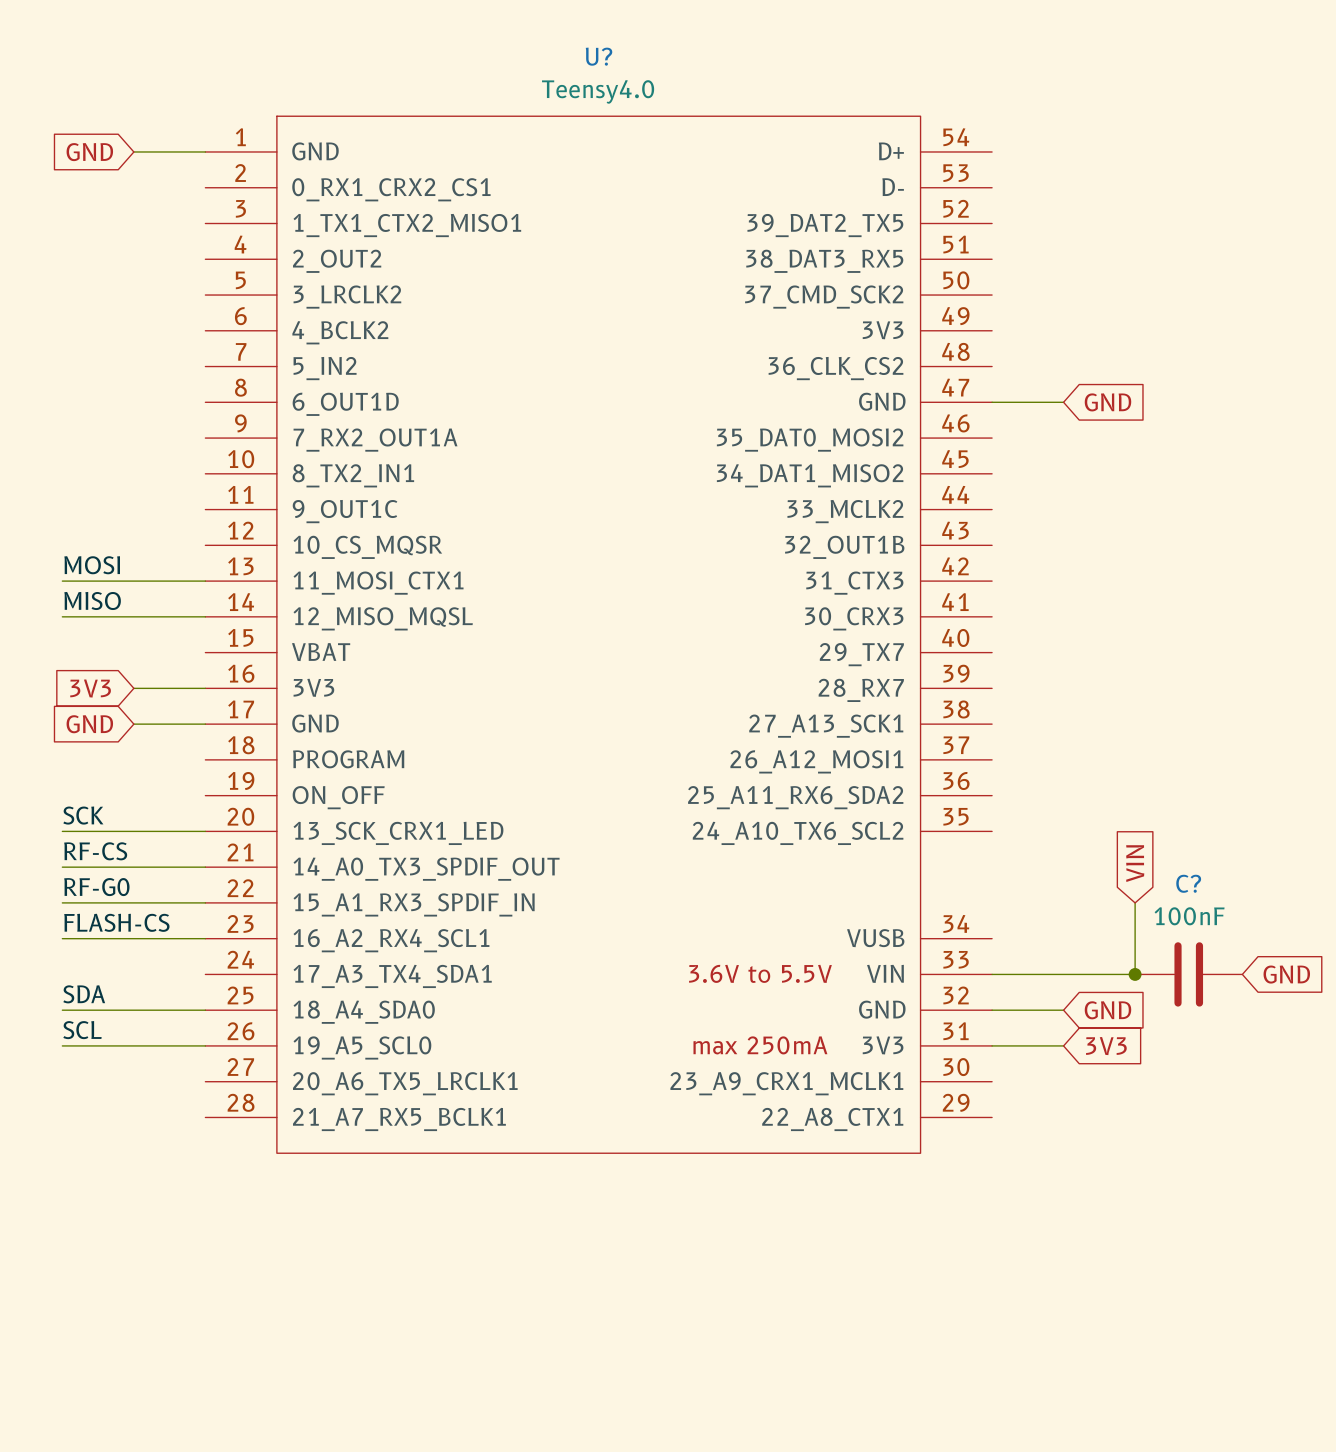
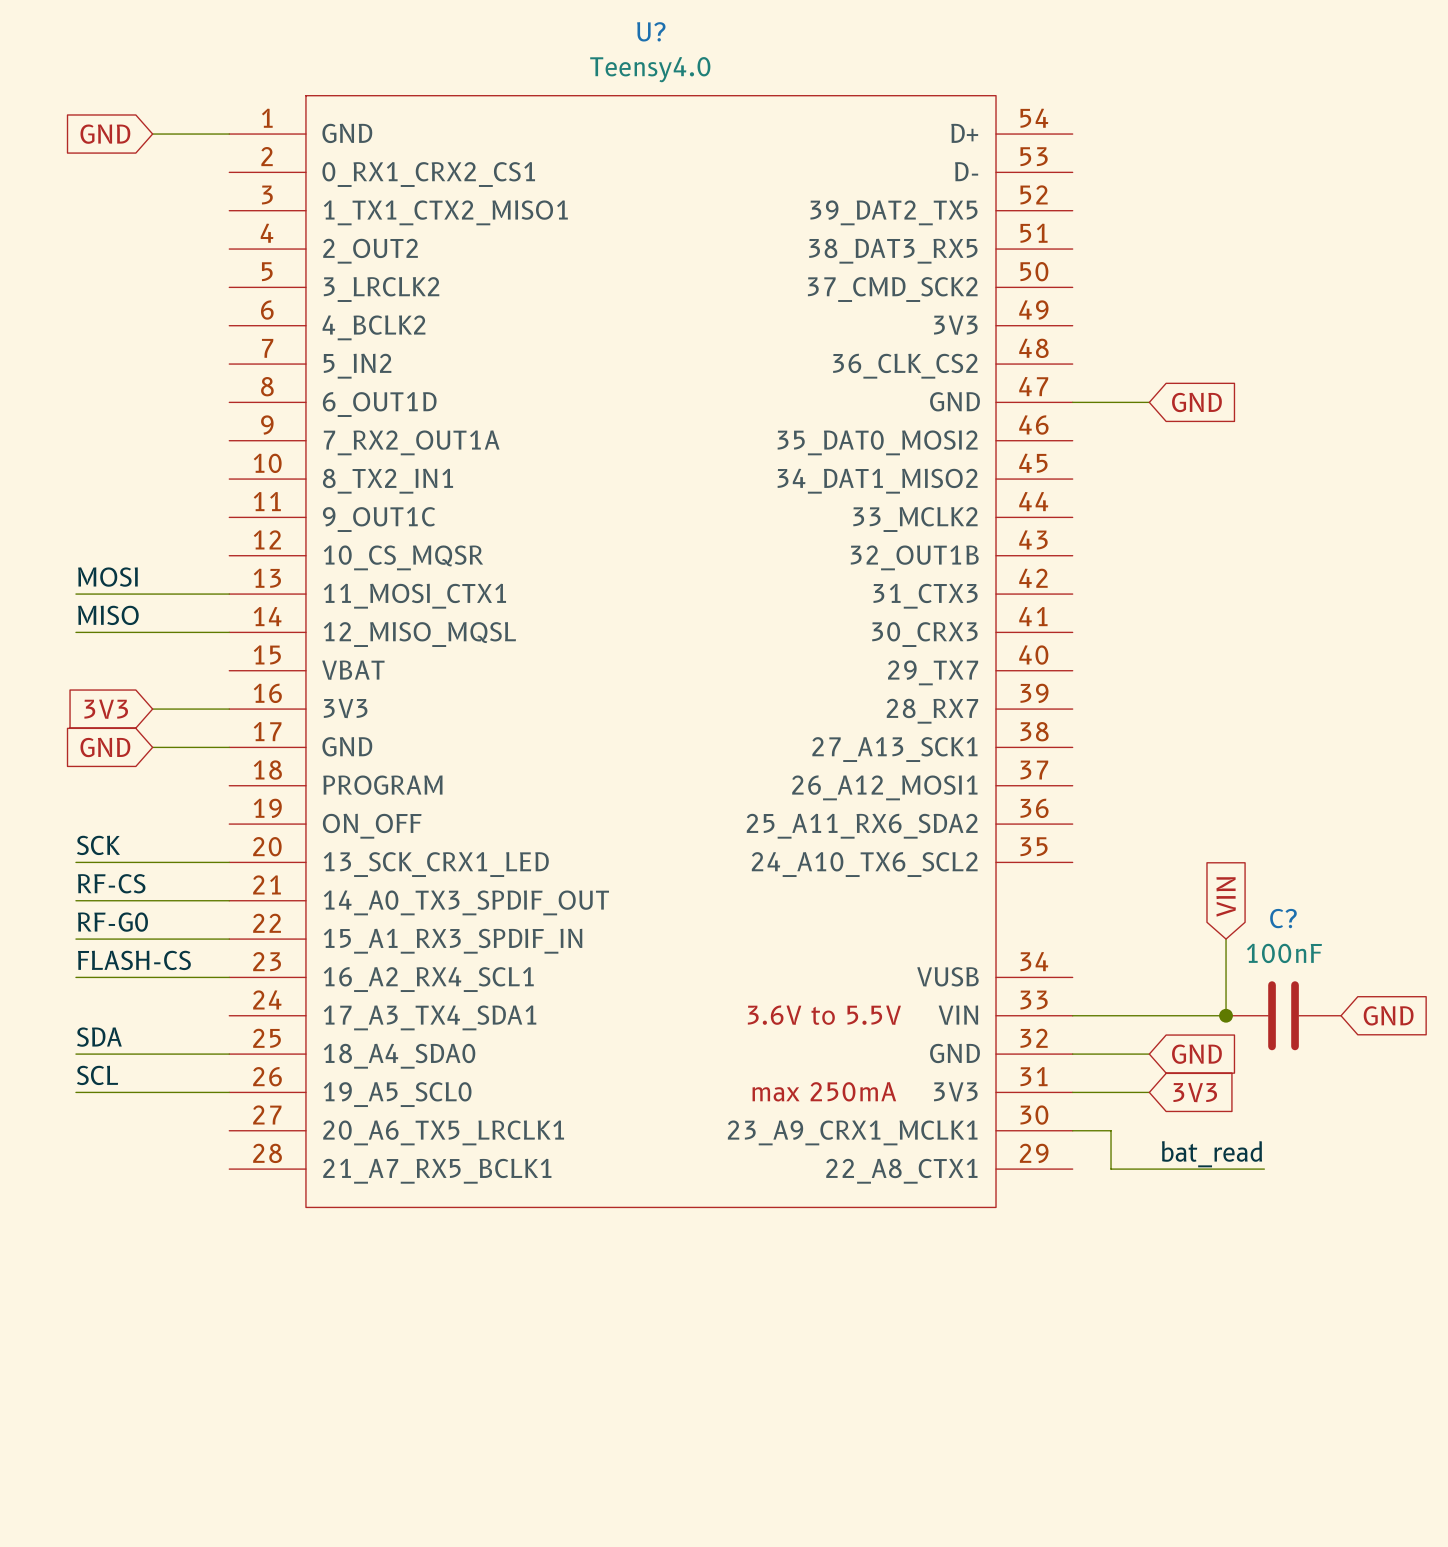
wire: none -> (1072, 1130) (1111, 1130) (1111, 1169) (1264, 1169)
label: none -> bat_read (1212, 1154)

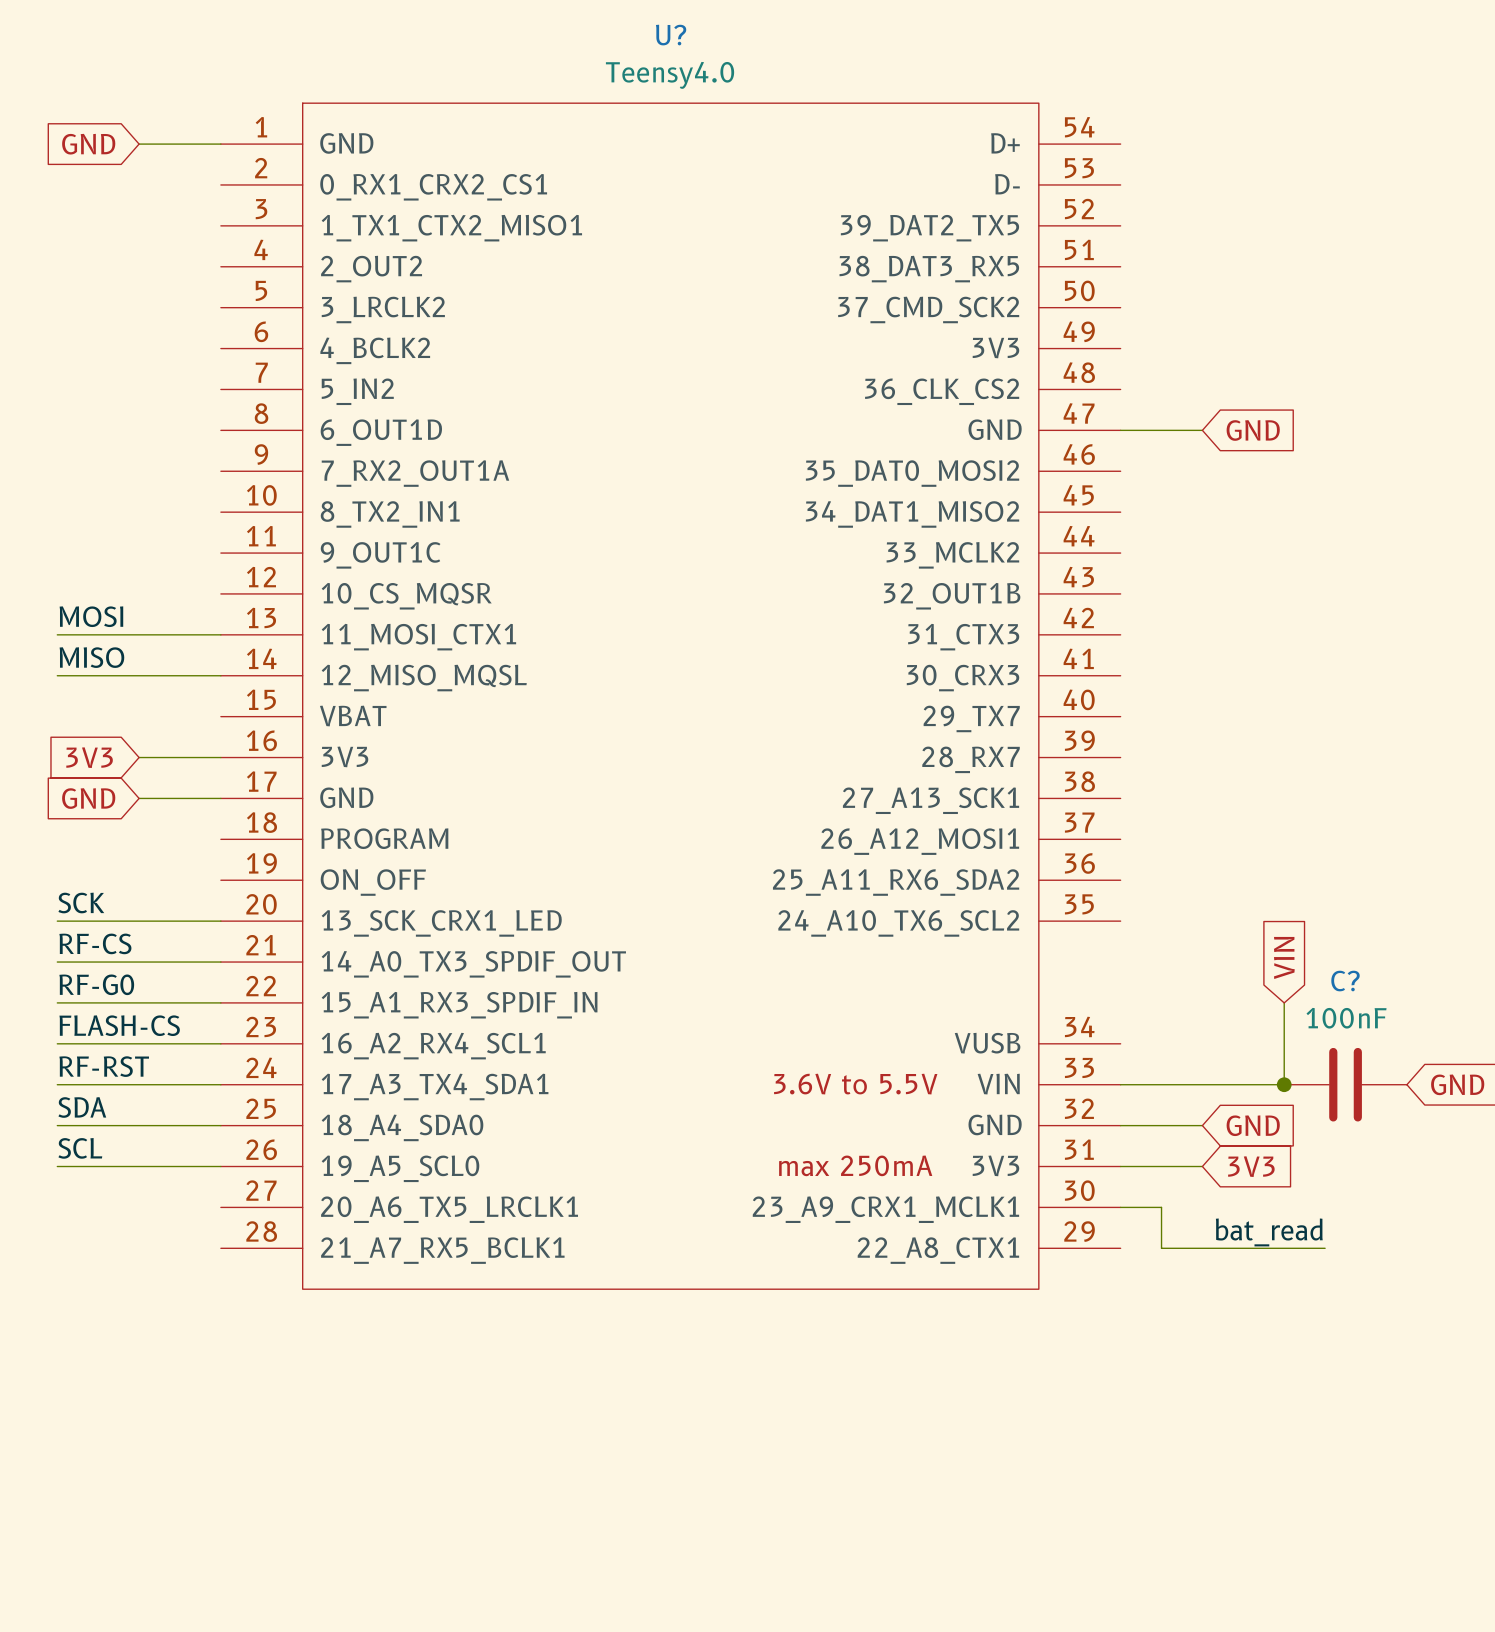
label: none -> RF-RST (104, 1066)
wire: none -> (57, 1084) (220, 1084)

